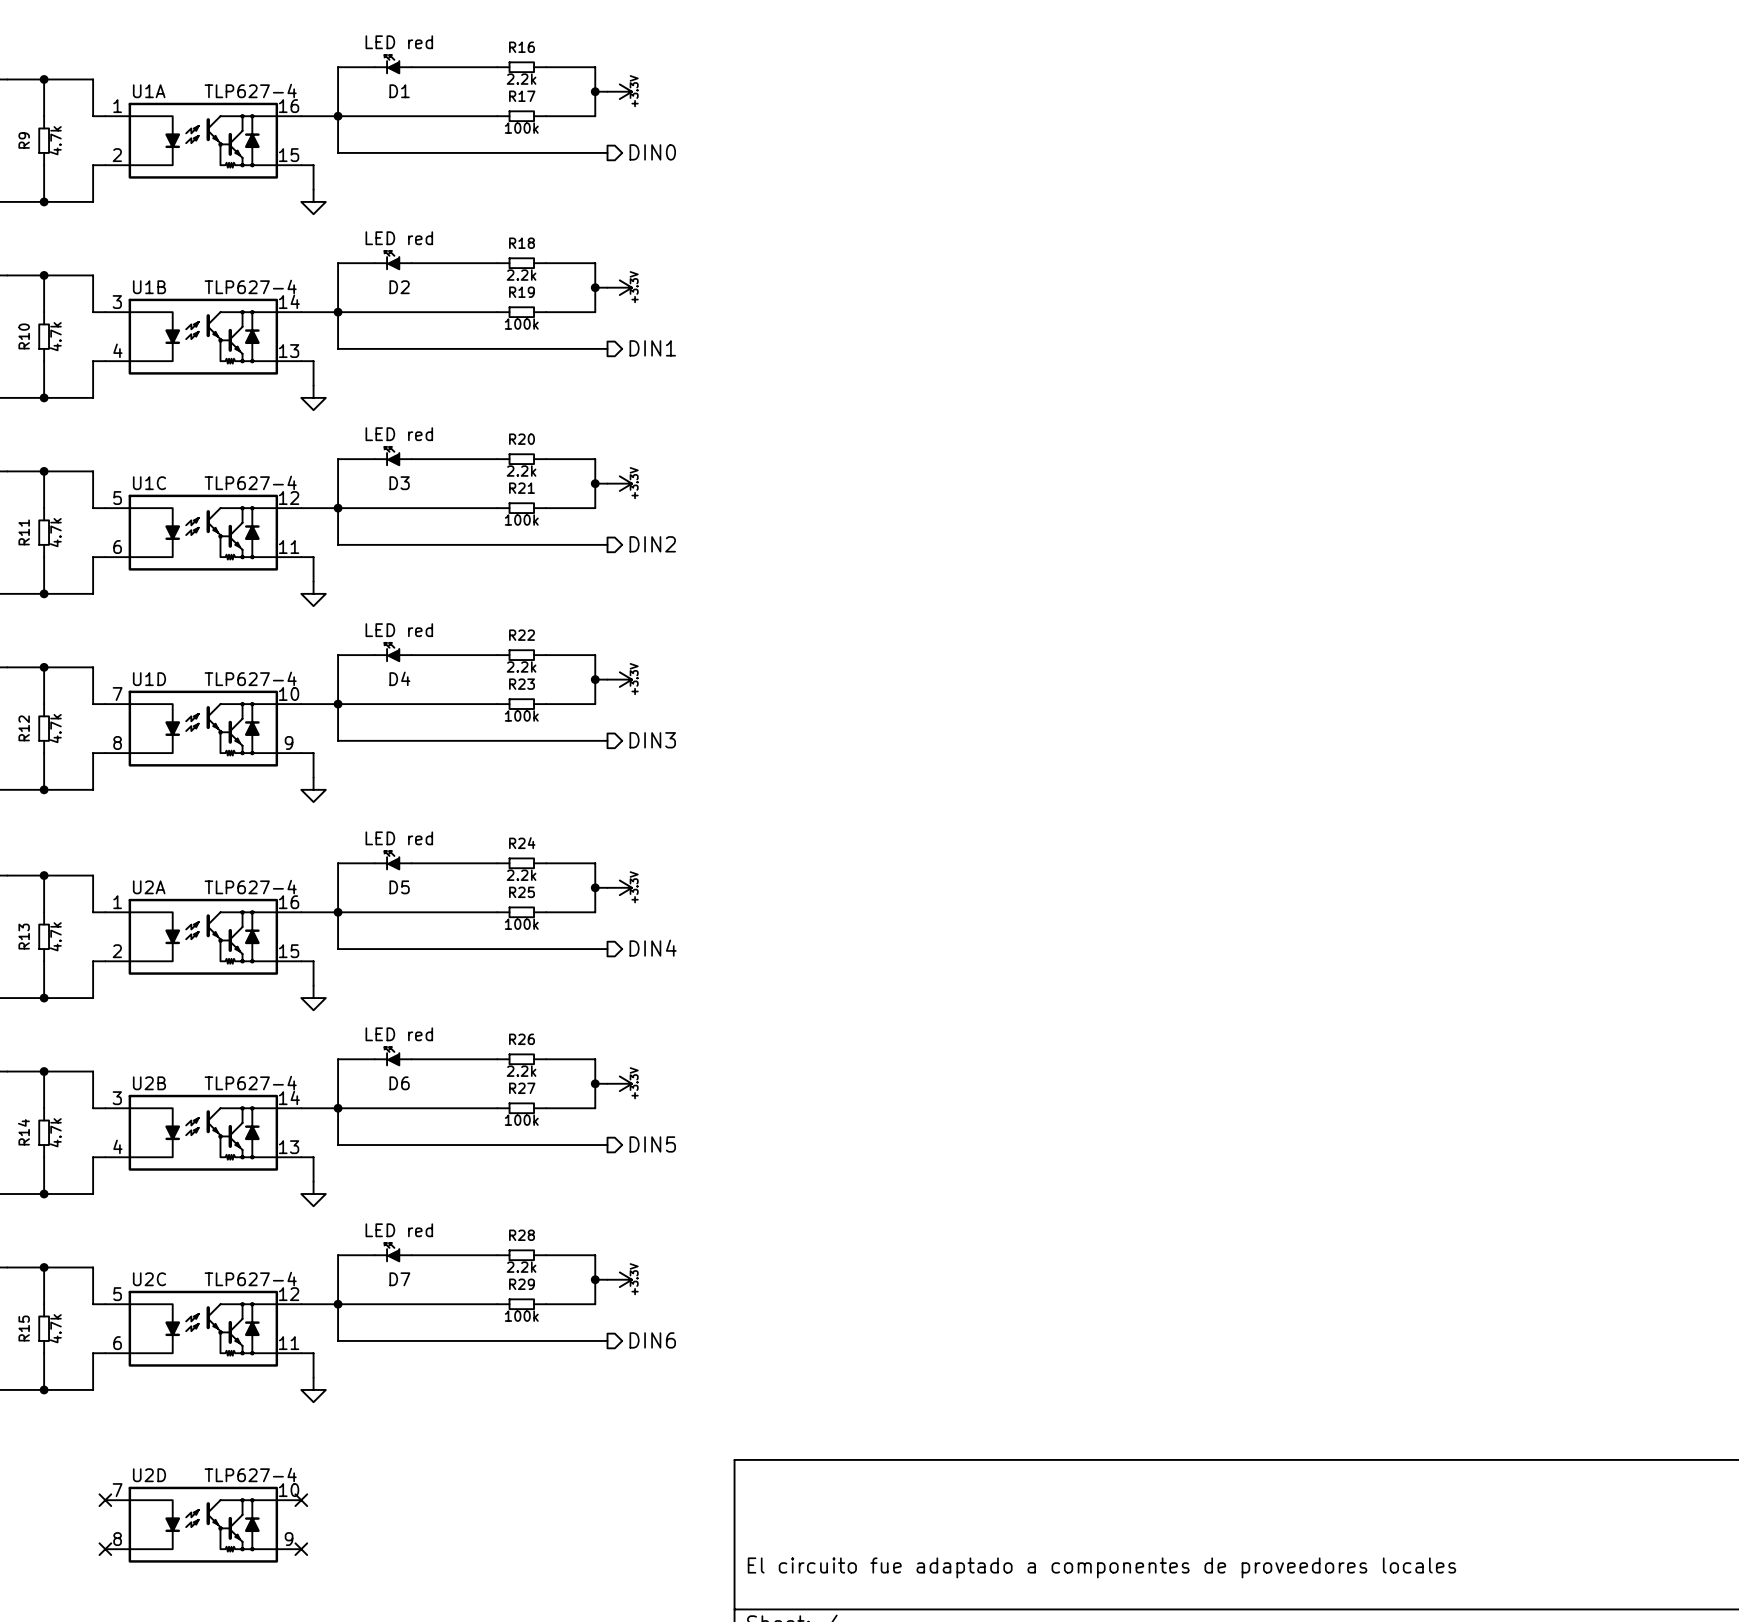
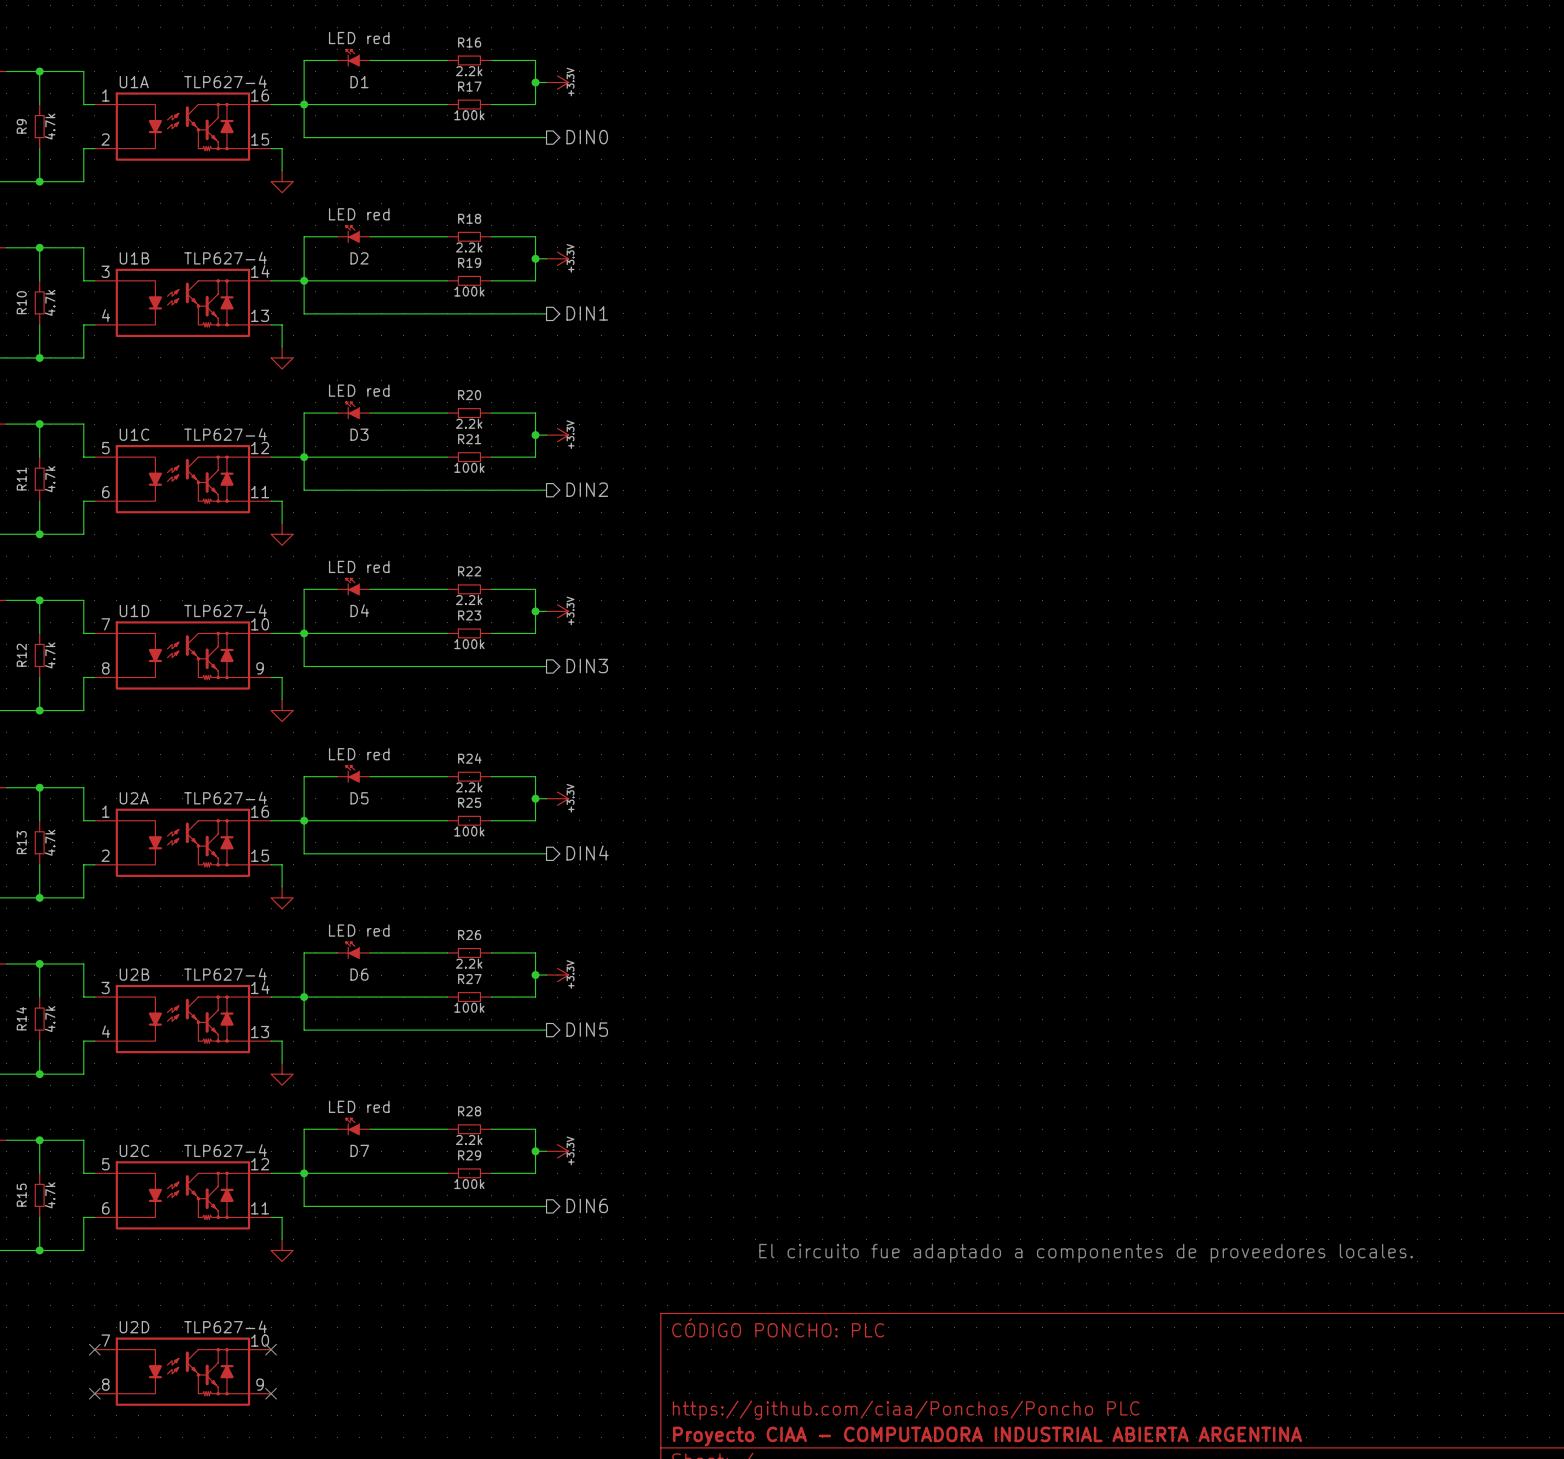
text: none -> El circuito fue adaptado a componentes de proveedores locales. (1086, 1253)
title block: none -> CÓDIGO PONCHO: PLC (778, 1327)
title block: El circuito fue adaptado a componentes de proveedores locales (1101, 1567) -> https://github.com/ciaa/Ponchos/Poncho PLC (906, 1410)
title block: none -> Proyecto CIAA - COMPUTADORA INDUSTRIAL ABIERTA ARGENTINA (987, 1436)

